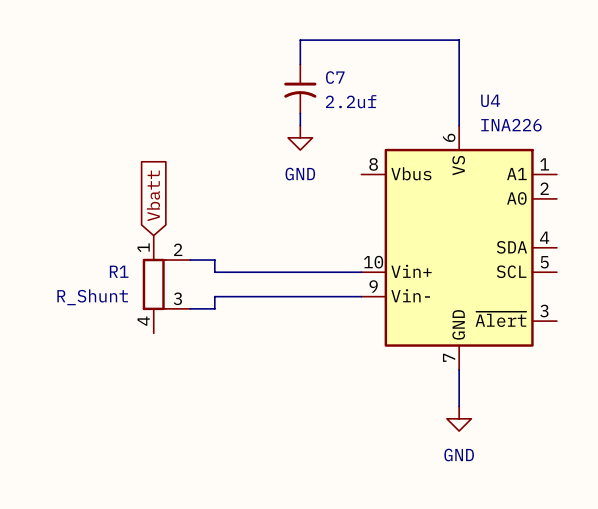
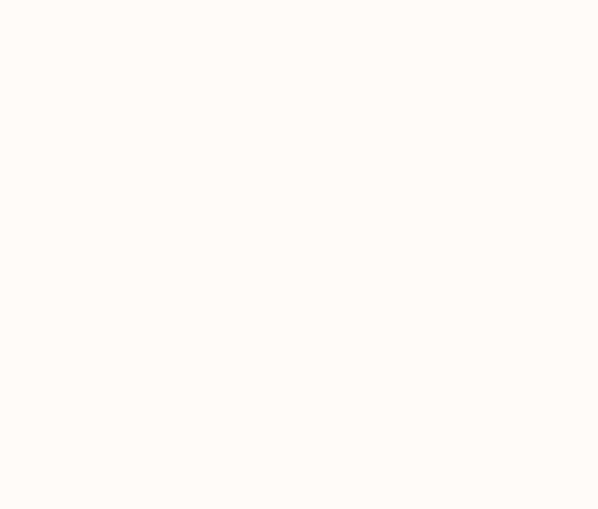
wire: (300, 64) (300, 40) (459, 40) (459, 125) -> none
C7: 2.2uf (300, 88) -> none
wire: (300, 113) (300, 125) -> none
power symbol: GND (300, 137) -> none
global label: Vbatt (153, 195) -> none
U4: INA226 (459, 247) -> none
wire: (190, 260) (214, 260) (214, 272) (361, 272) -> none
R1: R_Shunt (166, 284) -> none
wire: (361, 296) (214, 296) (214, 308) (190, 308) -> none
wire: (459, 369) (459, 406) -> none
power symbol: GND (459, 418) -> none

